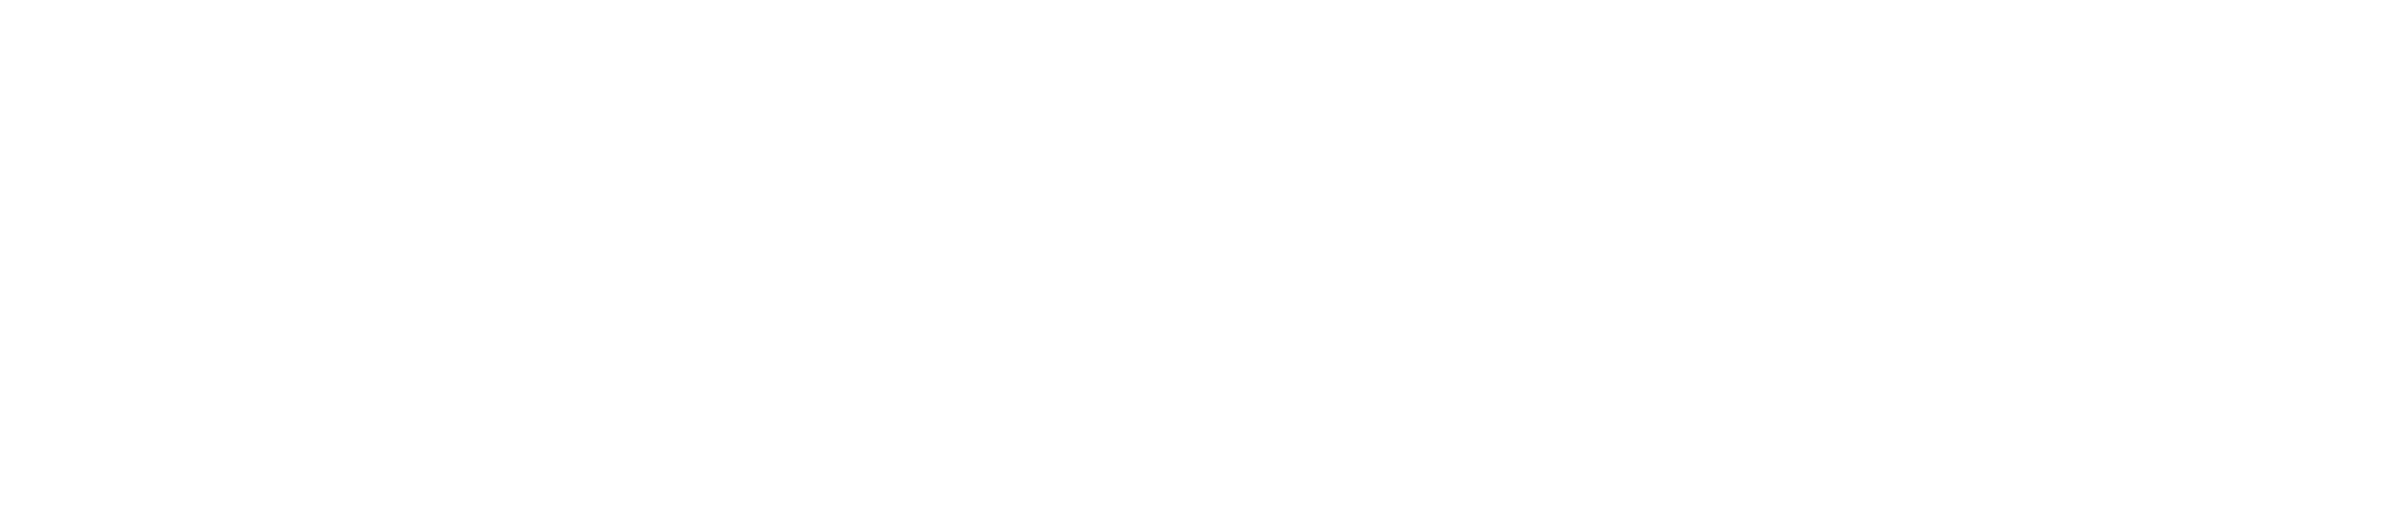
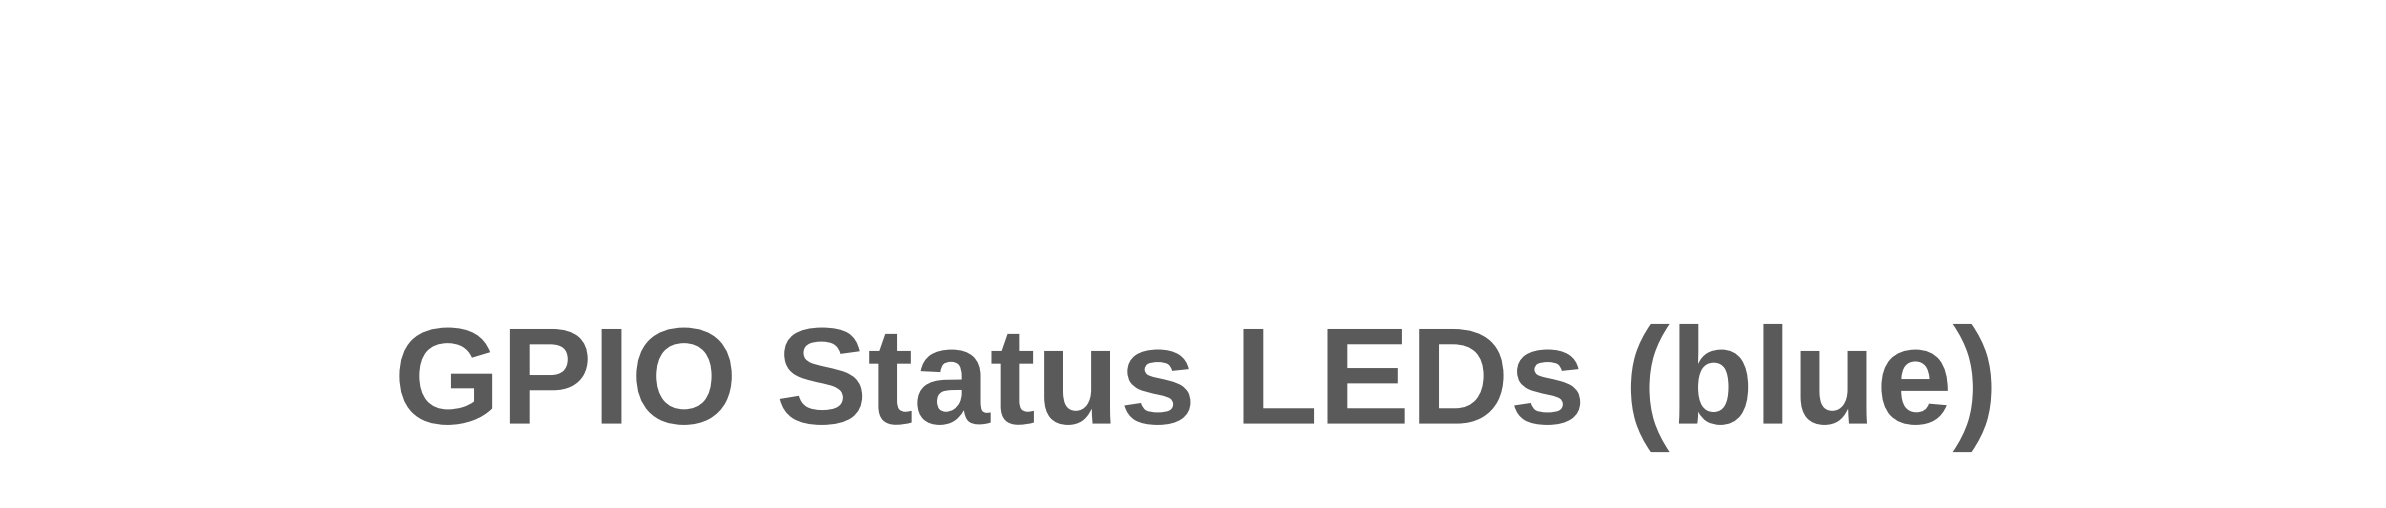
text: none -> GPIO Status LEDs (blue) (1195, 388)

